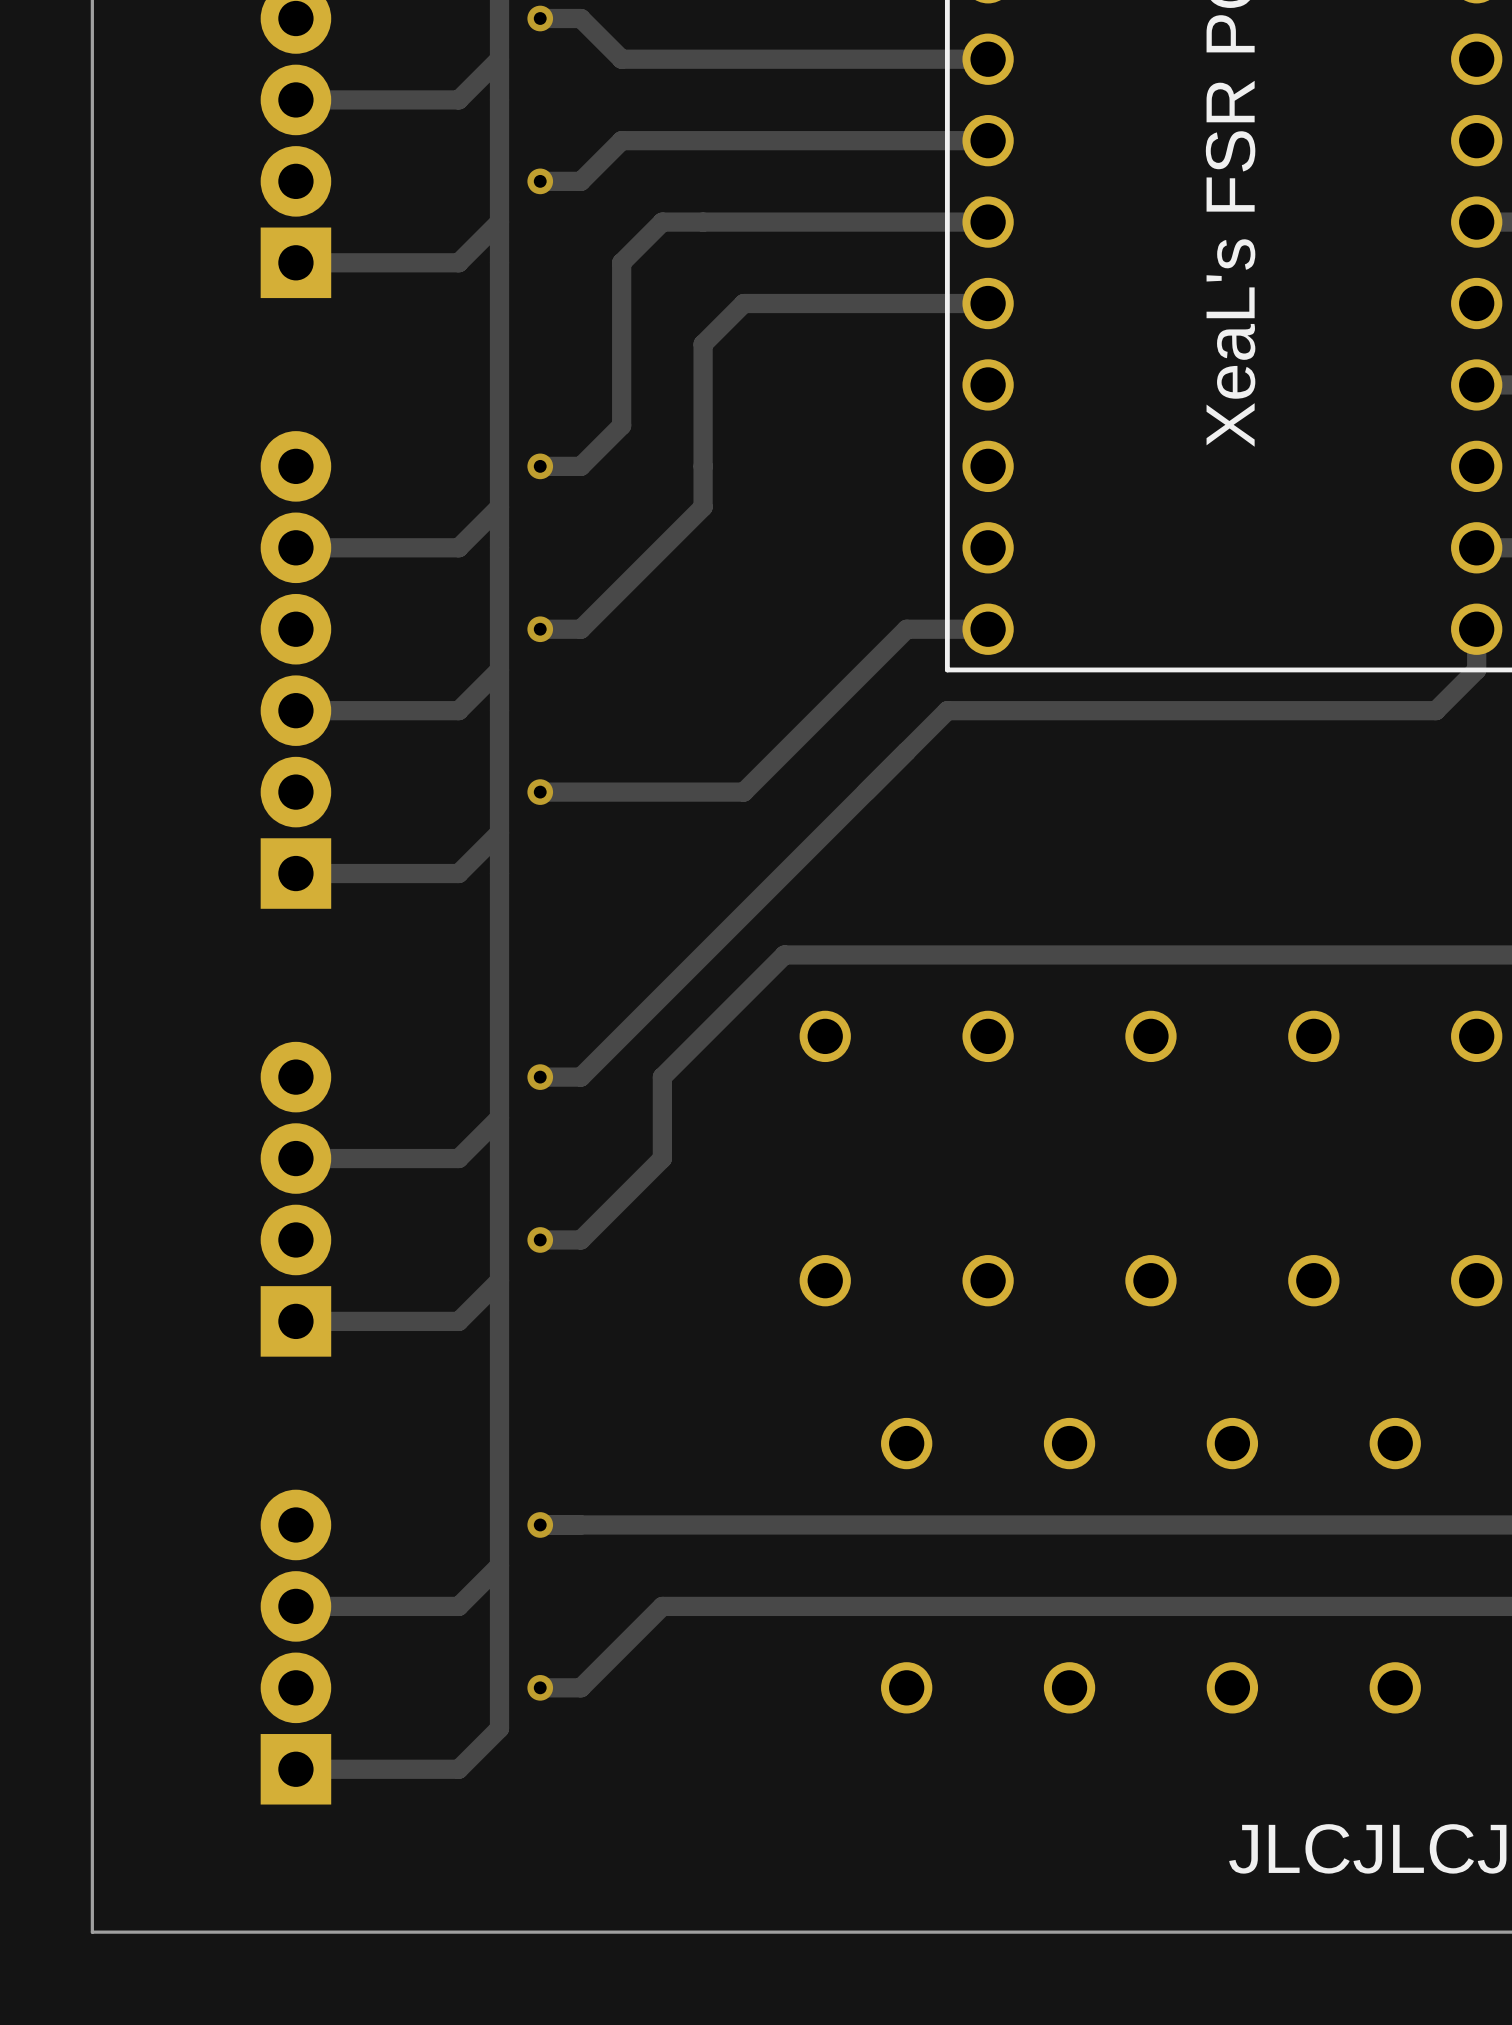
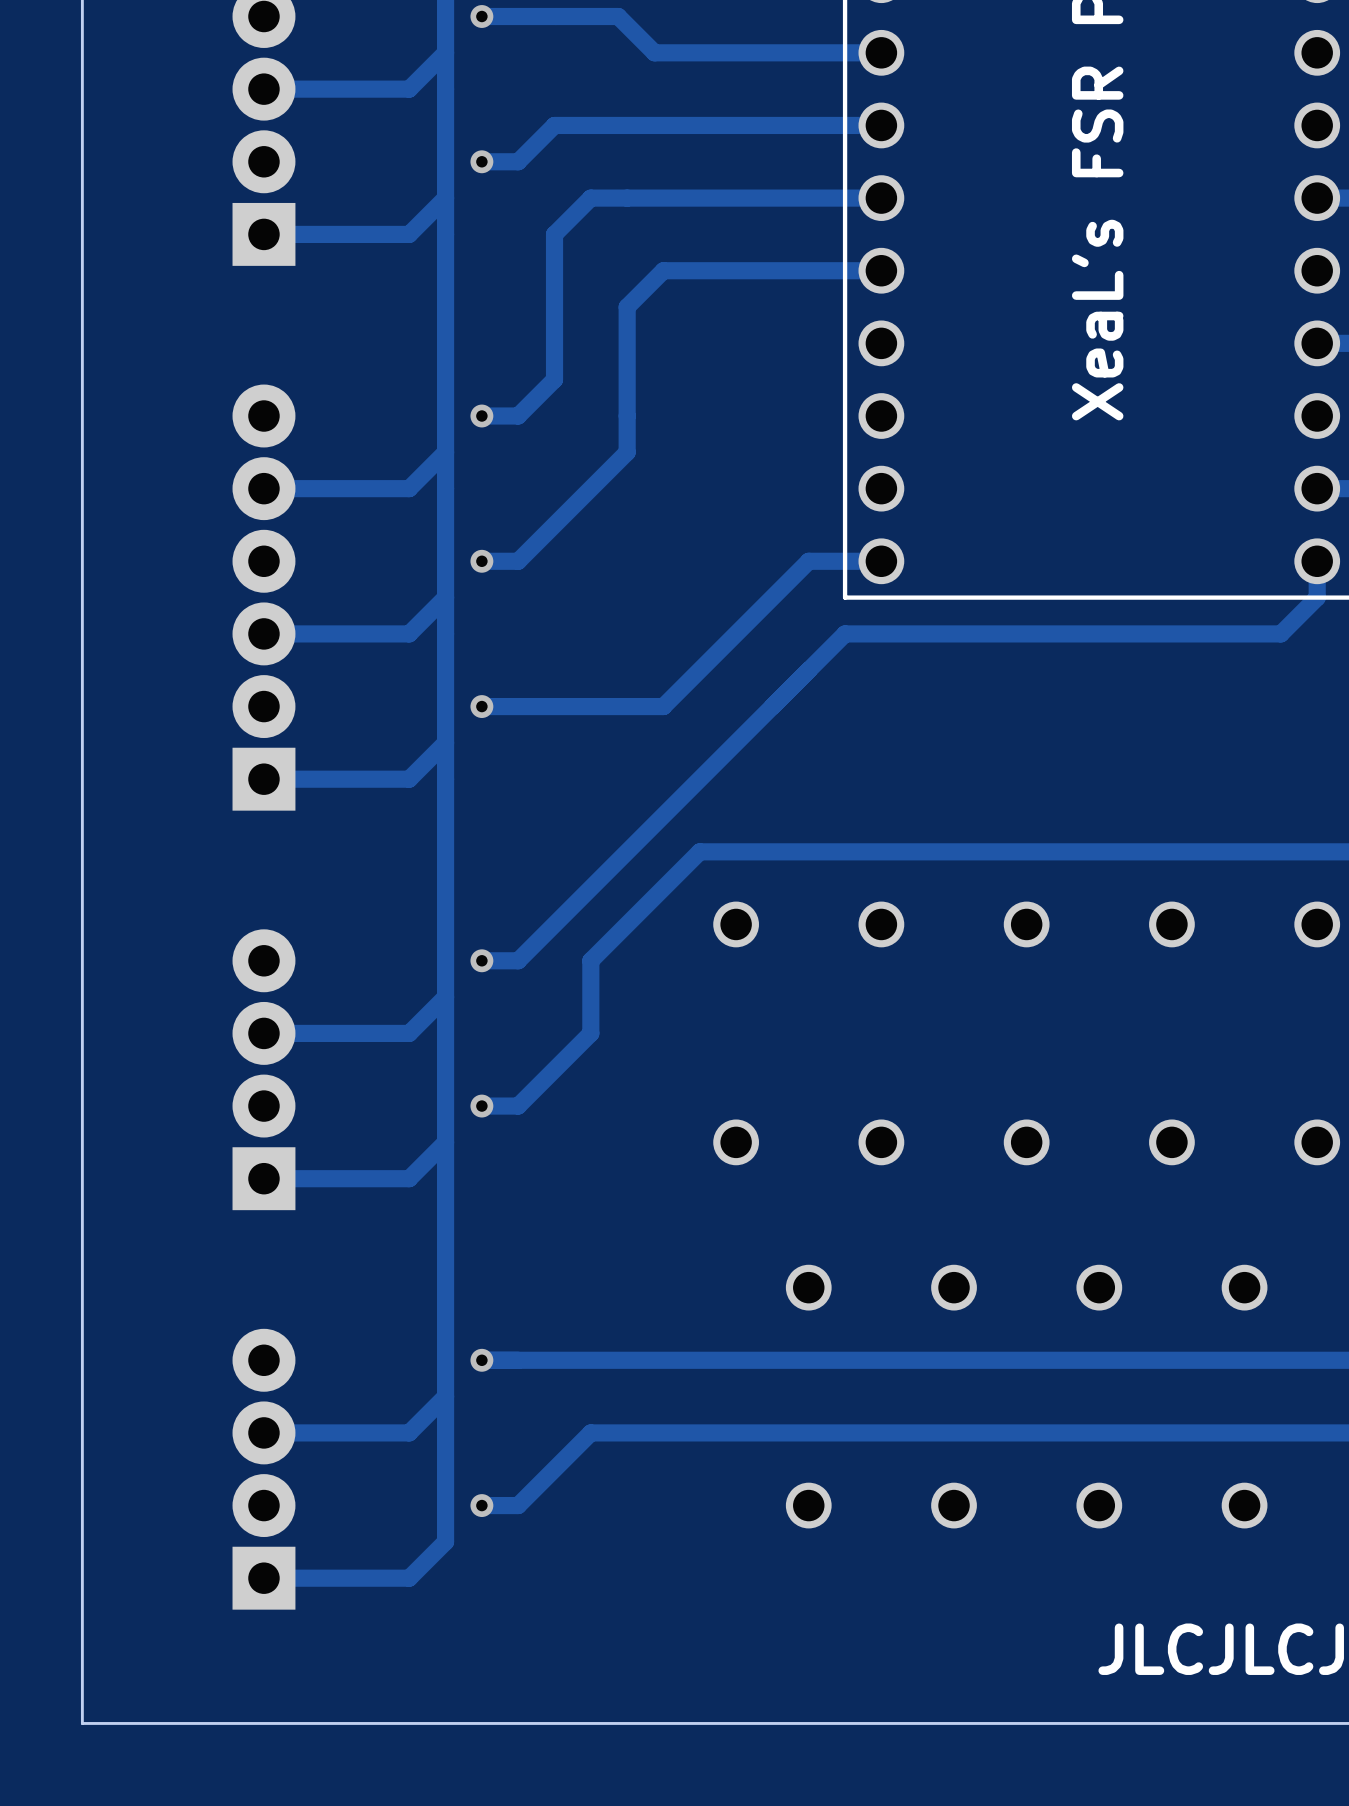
track: (580, 18) (621, 59) (733, 59) -> (518, 16) (618, 16) (654, 52)

